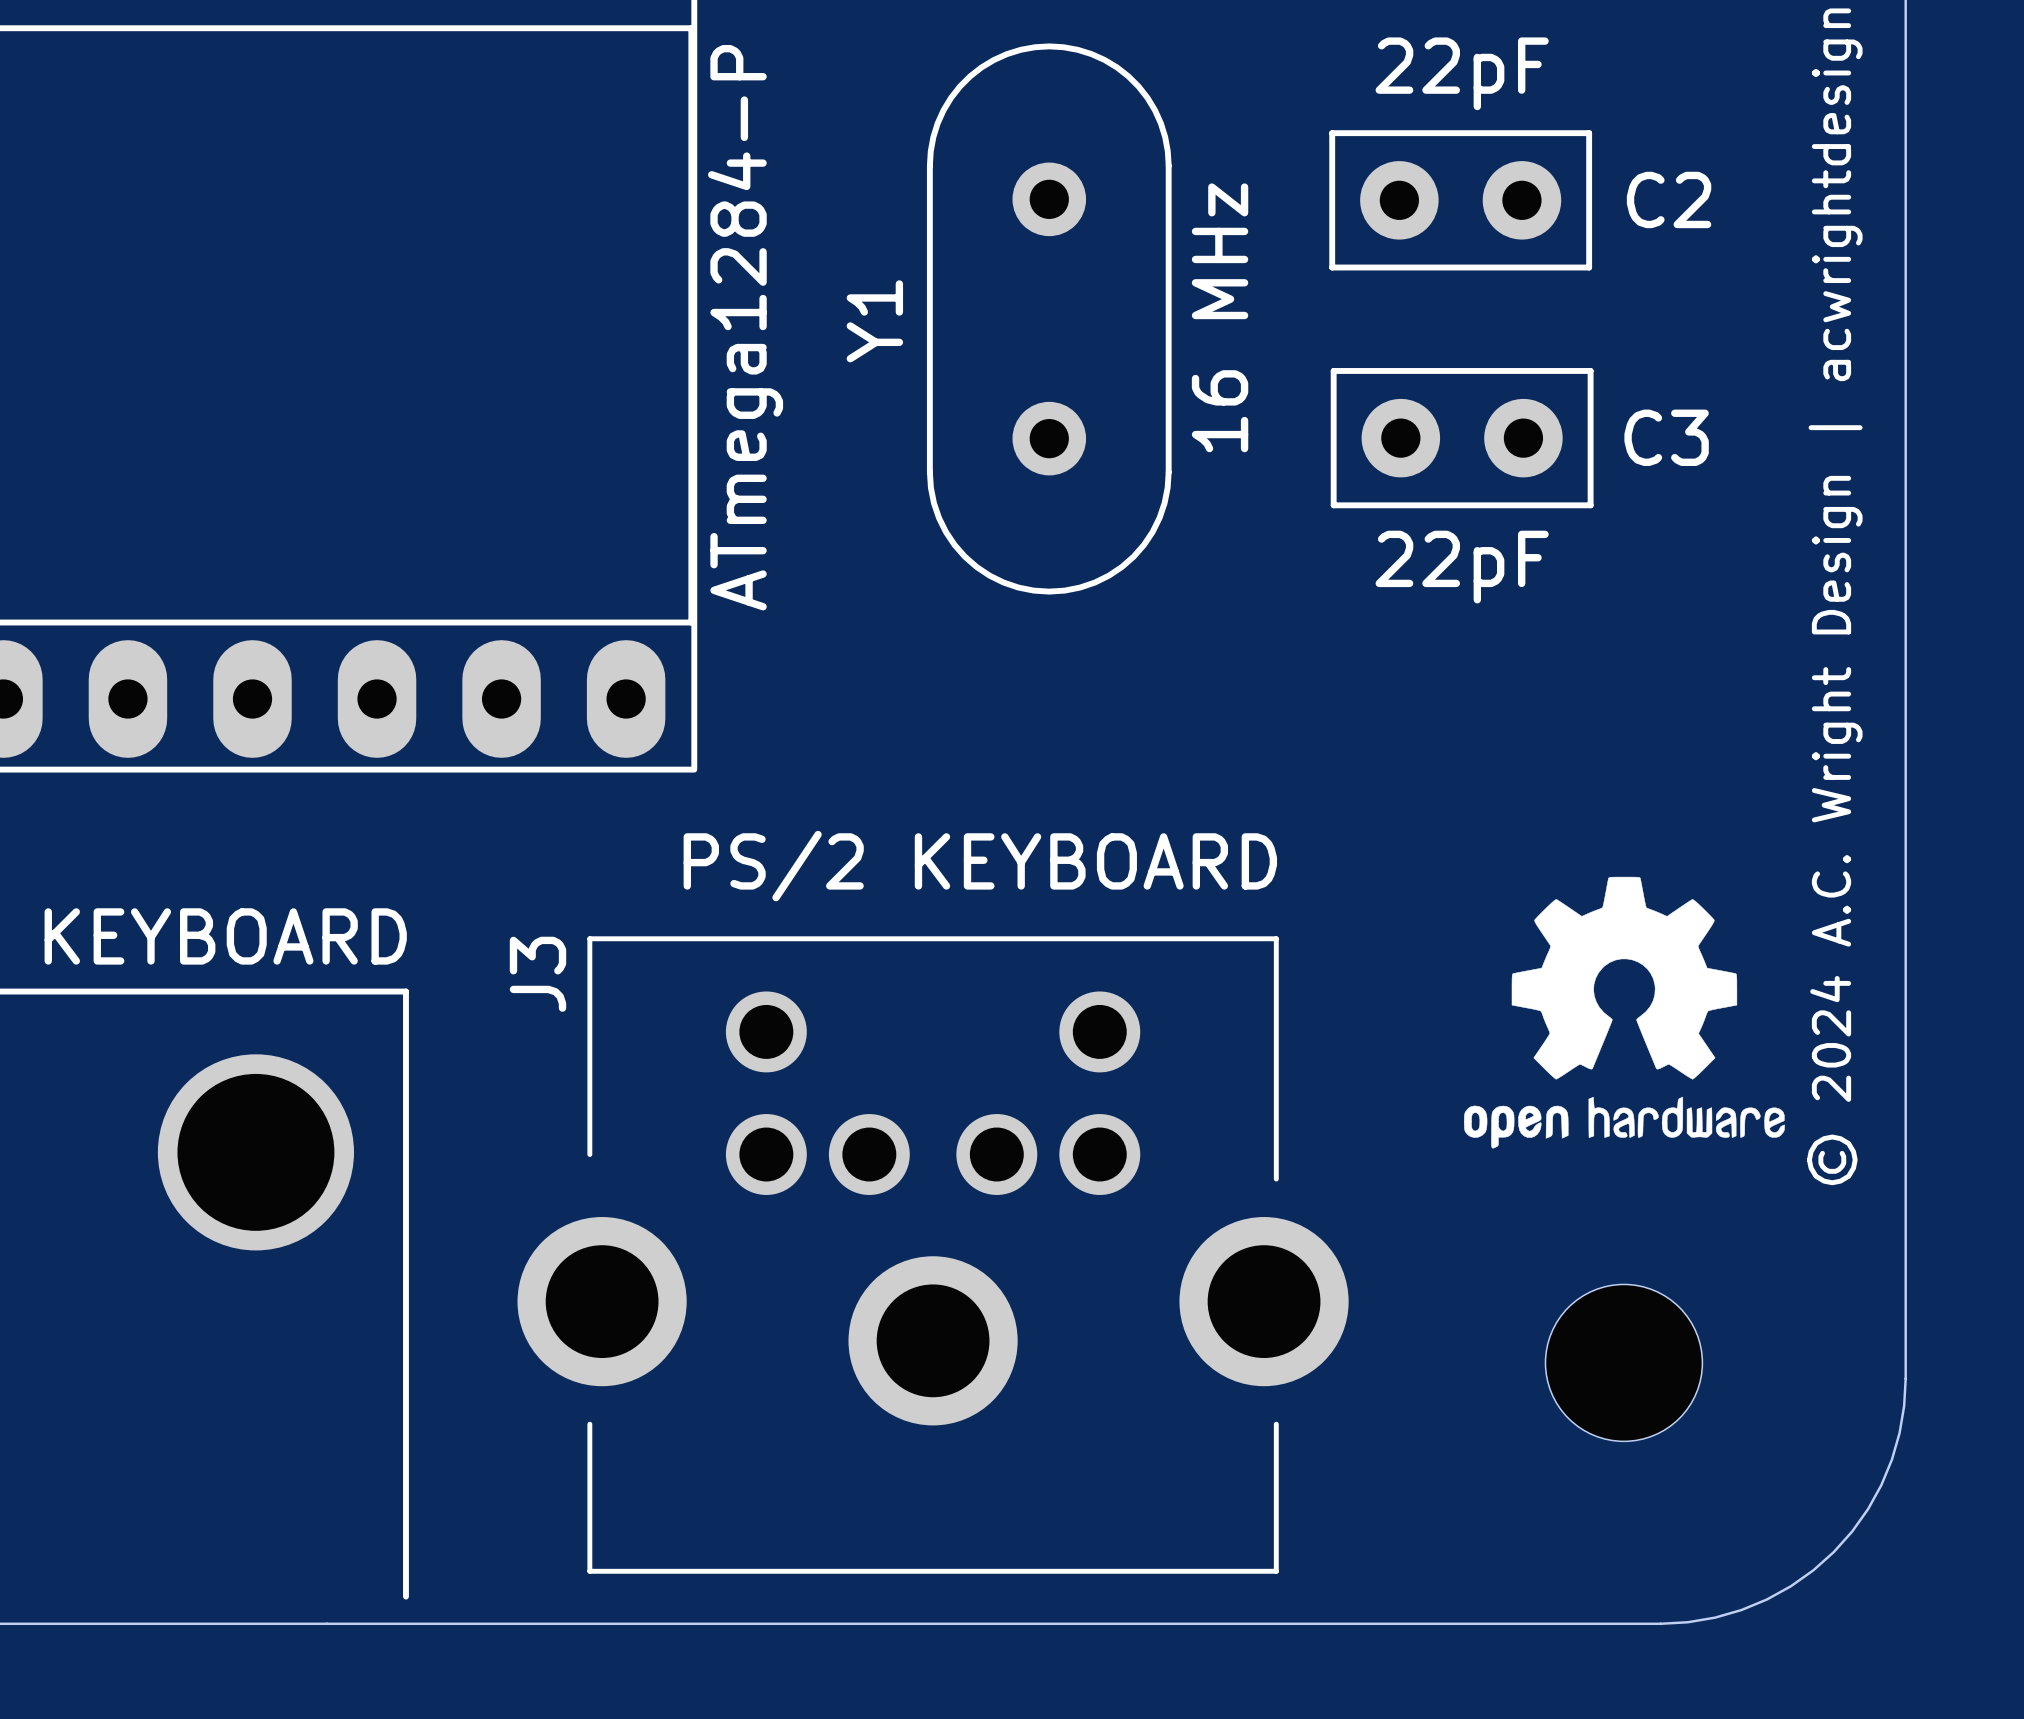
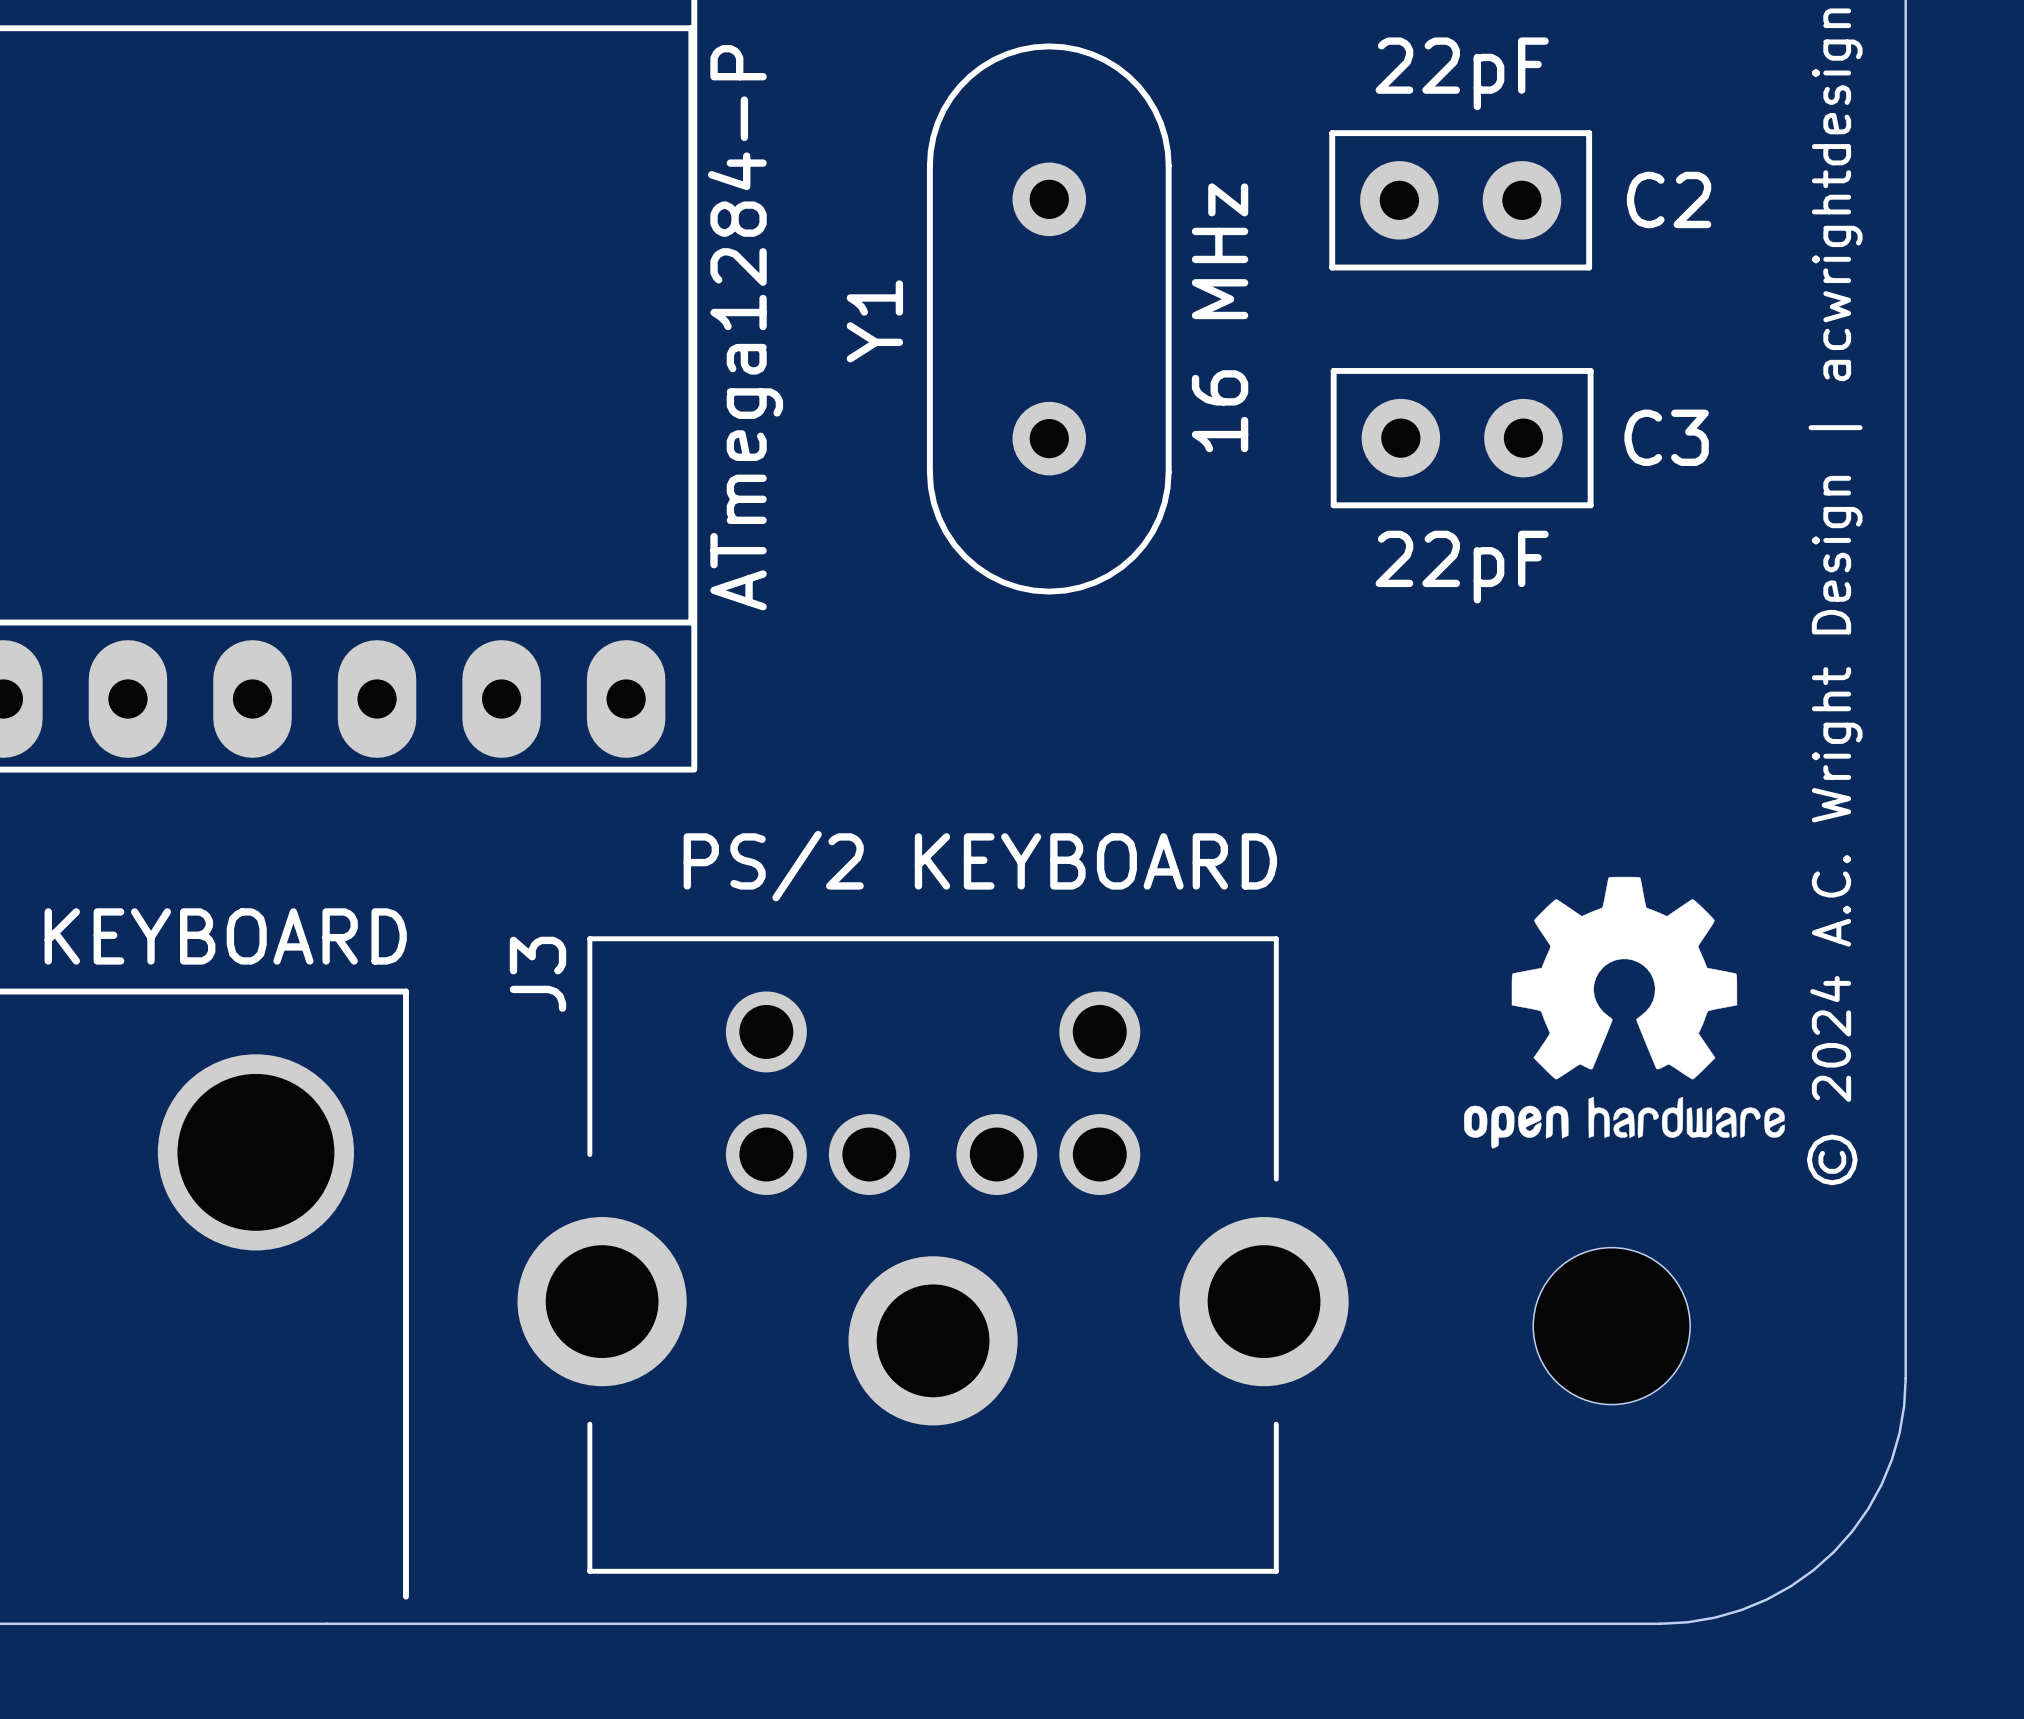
part position: (1623, 1362) -> (1611, 1326)

